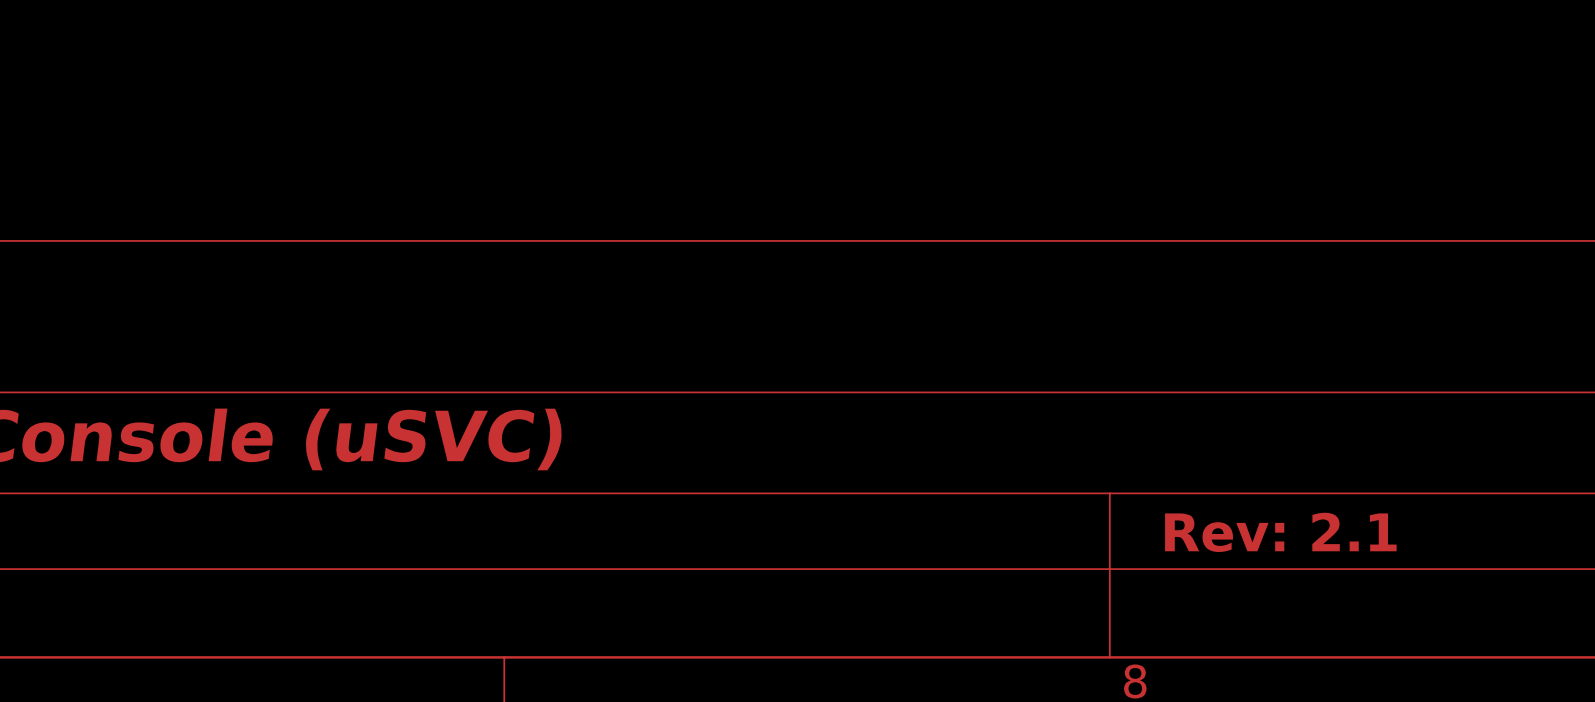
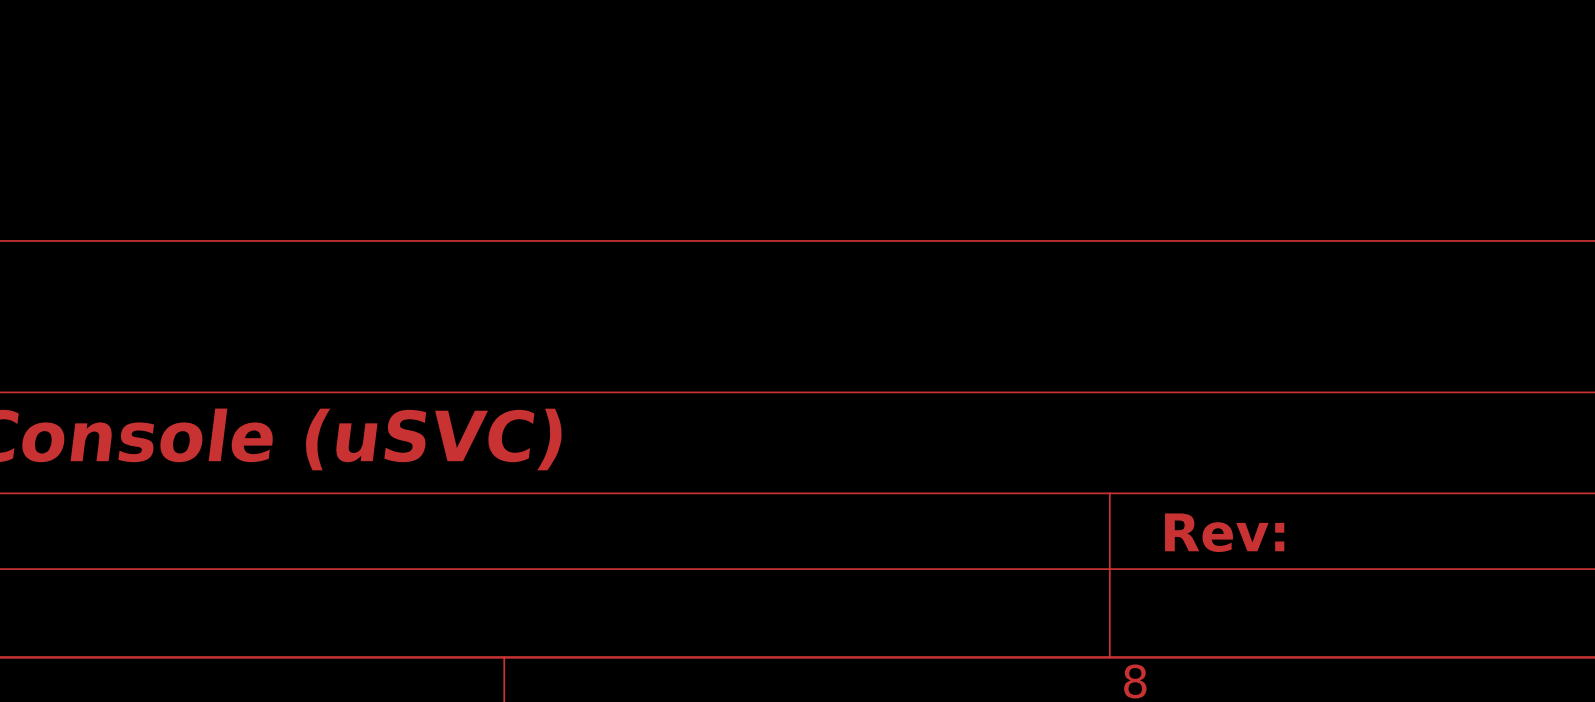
title block: Rev: 2.1 (1280, 532) -> Rev: (1224, 532)

